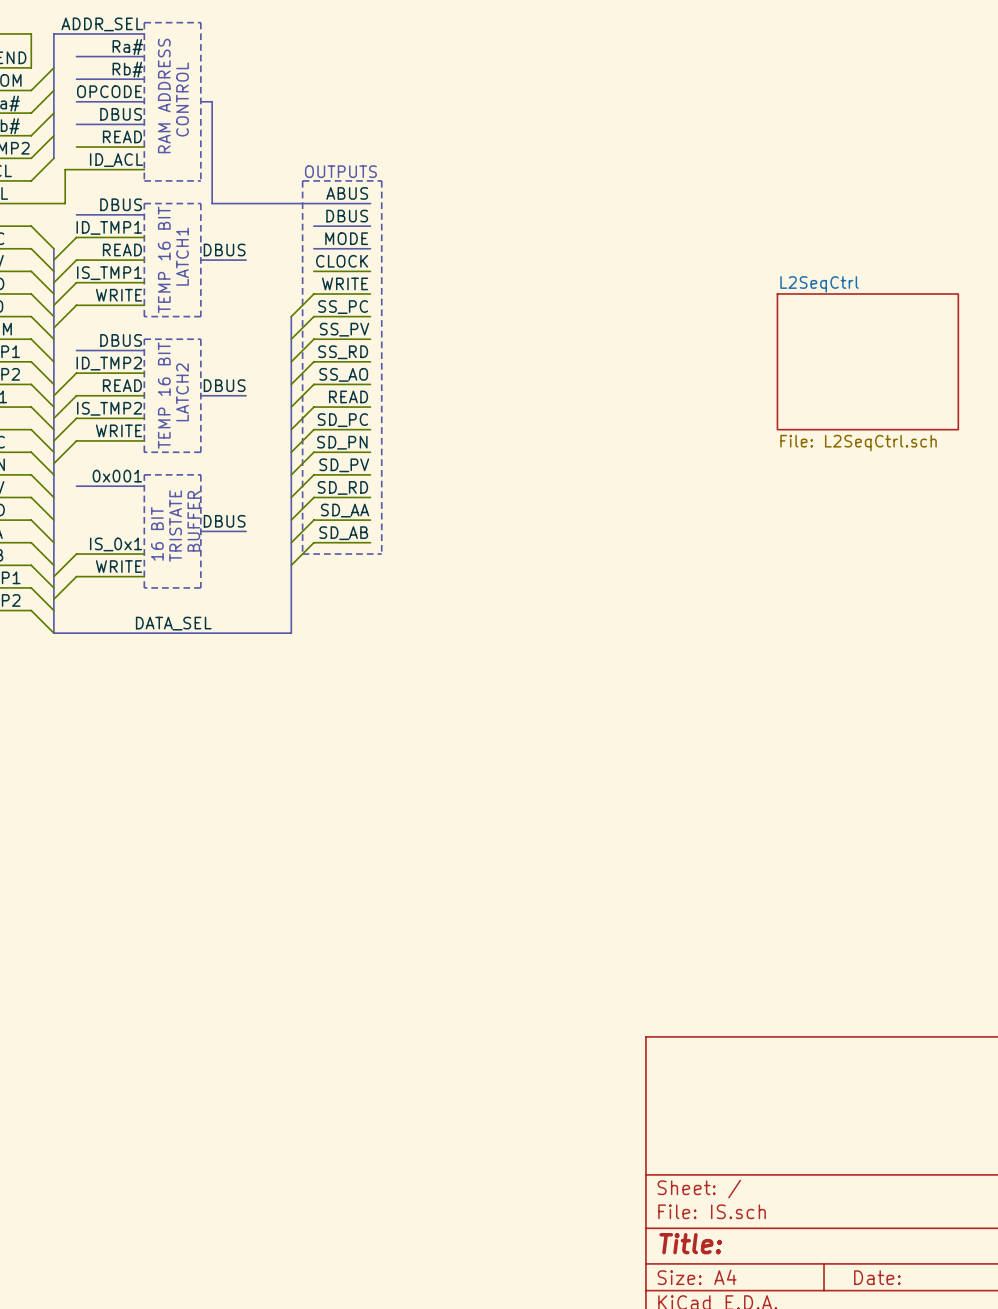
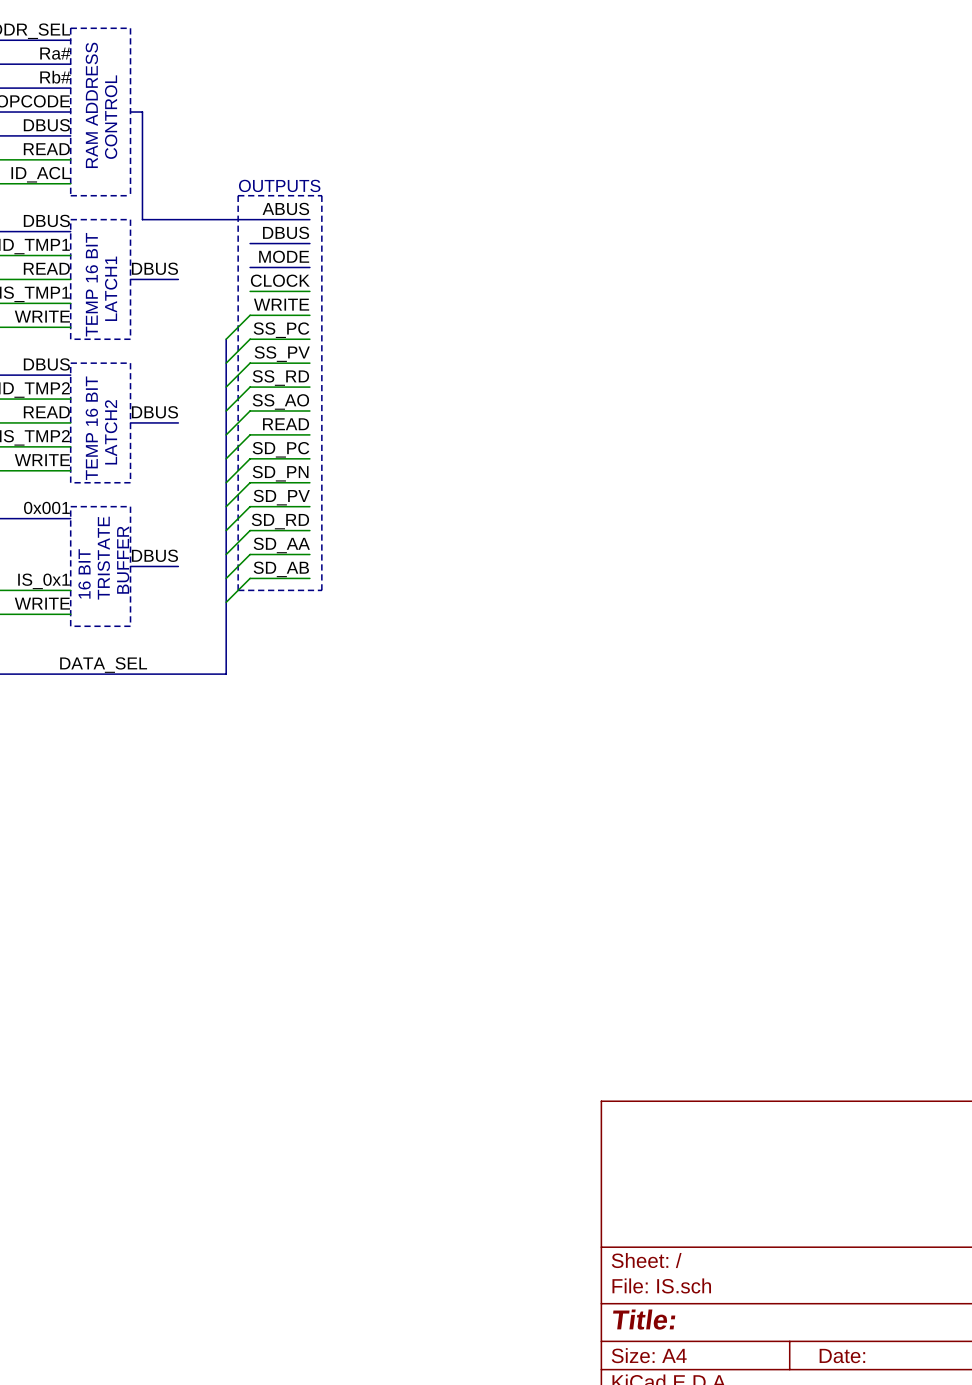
sheet L2SeqCtrl: File: L2SeqCtrl.sch (867, 361) -> none

